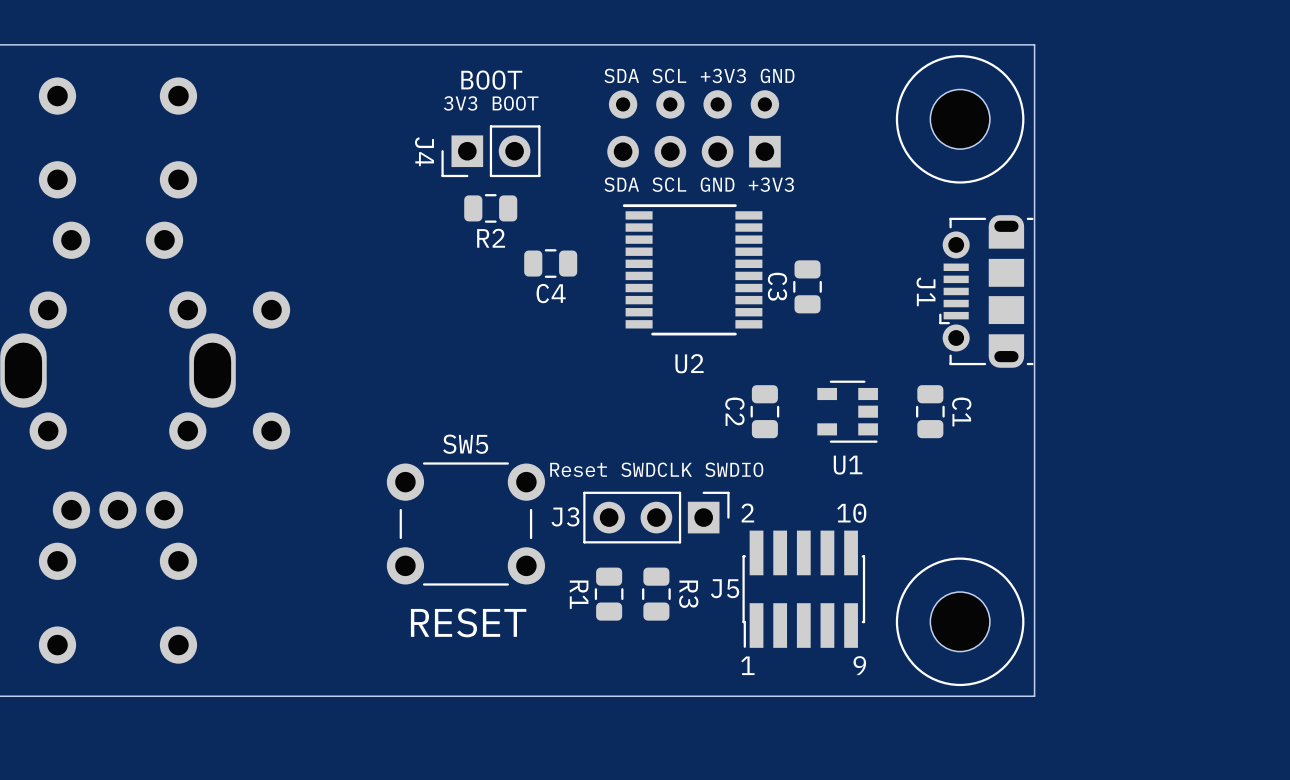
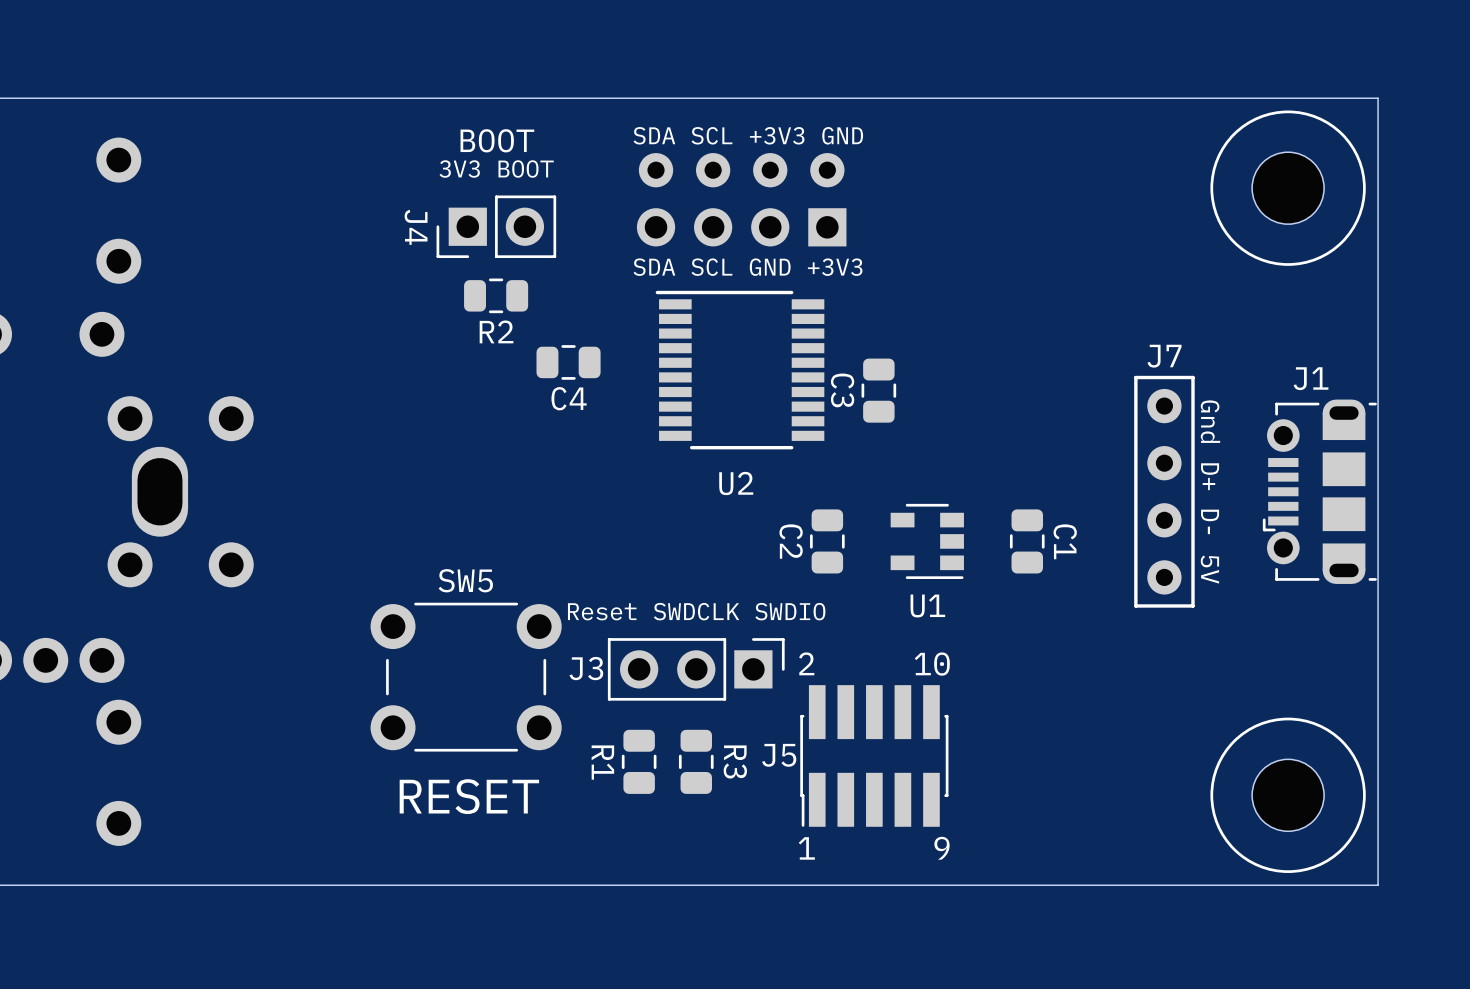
board edge: (1034, 44) (1034, 696) -> (1153, 98) (1378, 98) (1378, 885) (1153, 885)
part position: (960, 119) -> (1288, 188)
drawing position: (960, 119) -> (1288, 188)
J1 name rotation: 0° (926, 291) -> 90° counterclockwise (1311, 378)
J1 name position: J1 (926, 291) -> J1 (1311, 378)
J1 position: (986, 291) -> (1319, 491)
J7: none -> (1164, 491)
text: none -> Gnd D+ D- 5V (1210, 492)
part position: (960, 621) -> (1288, 795)
drawing position: (960, 621) -> (1288, 795)

